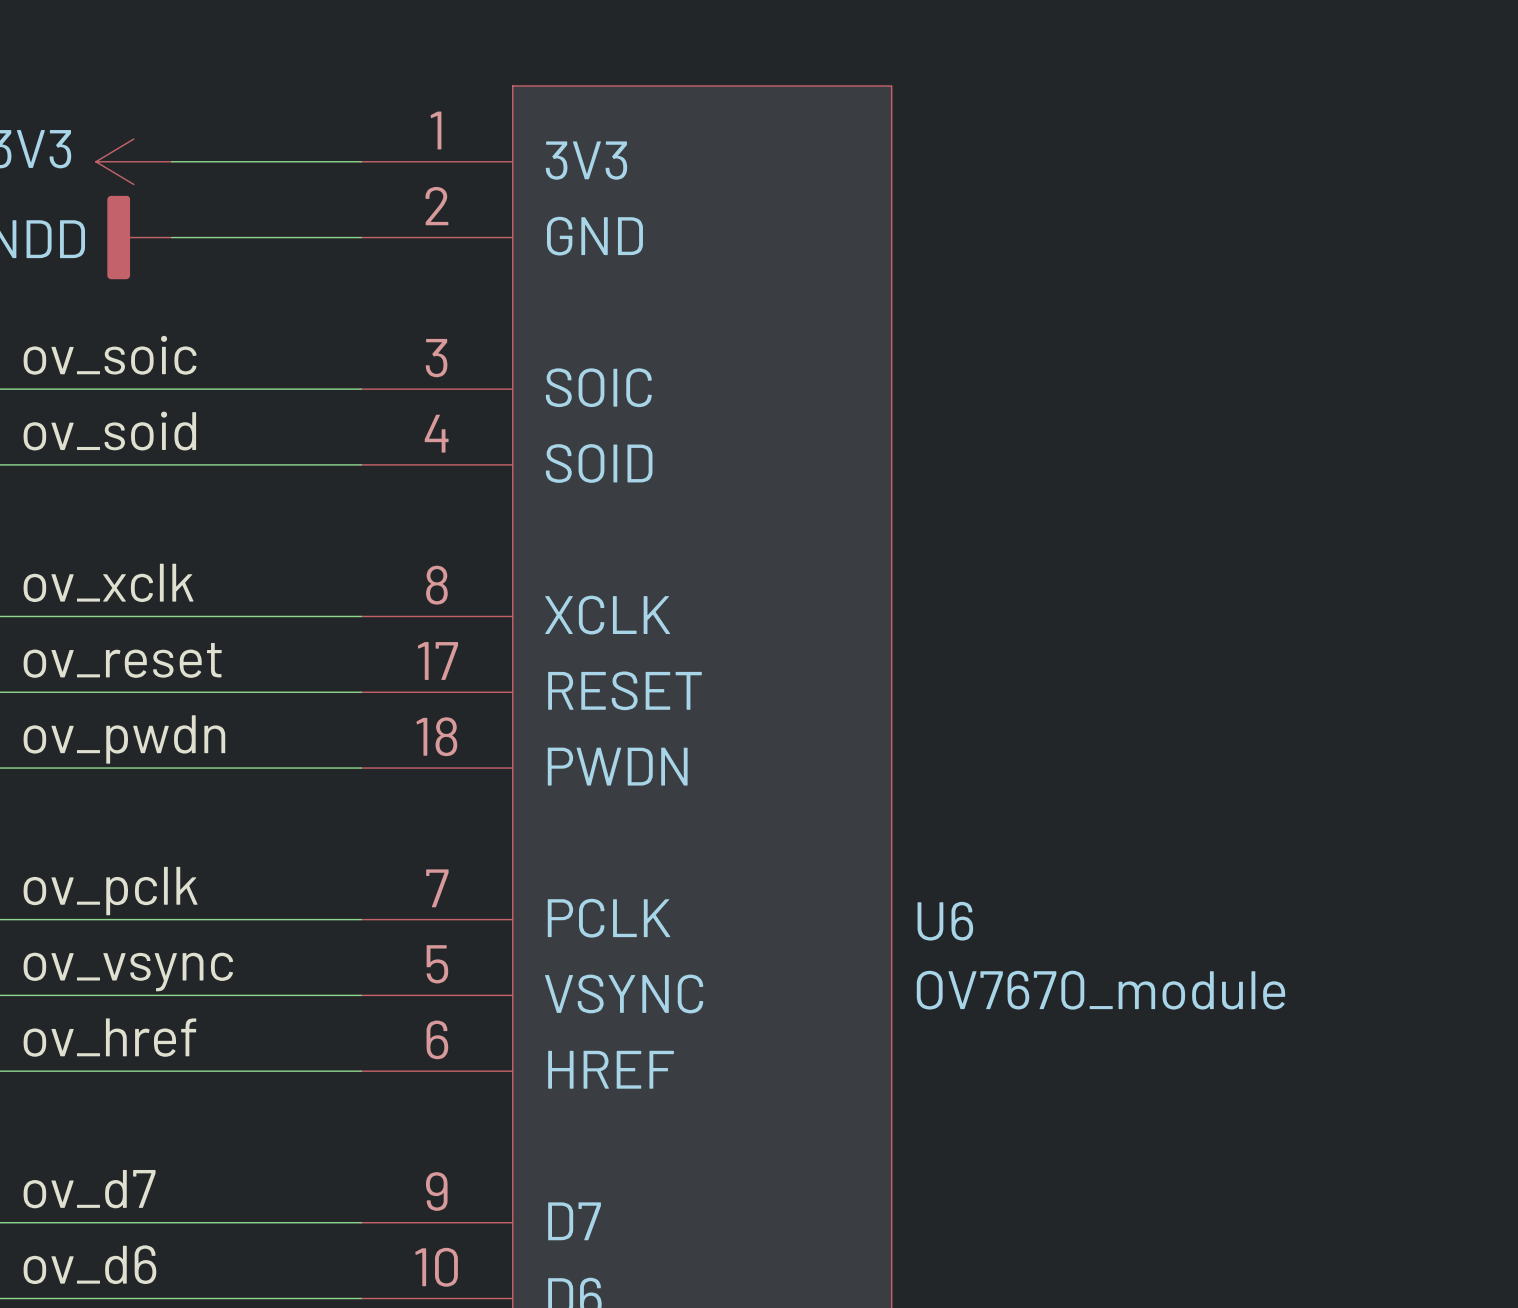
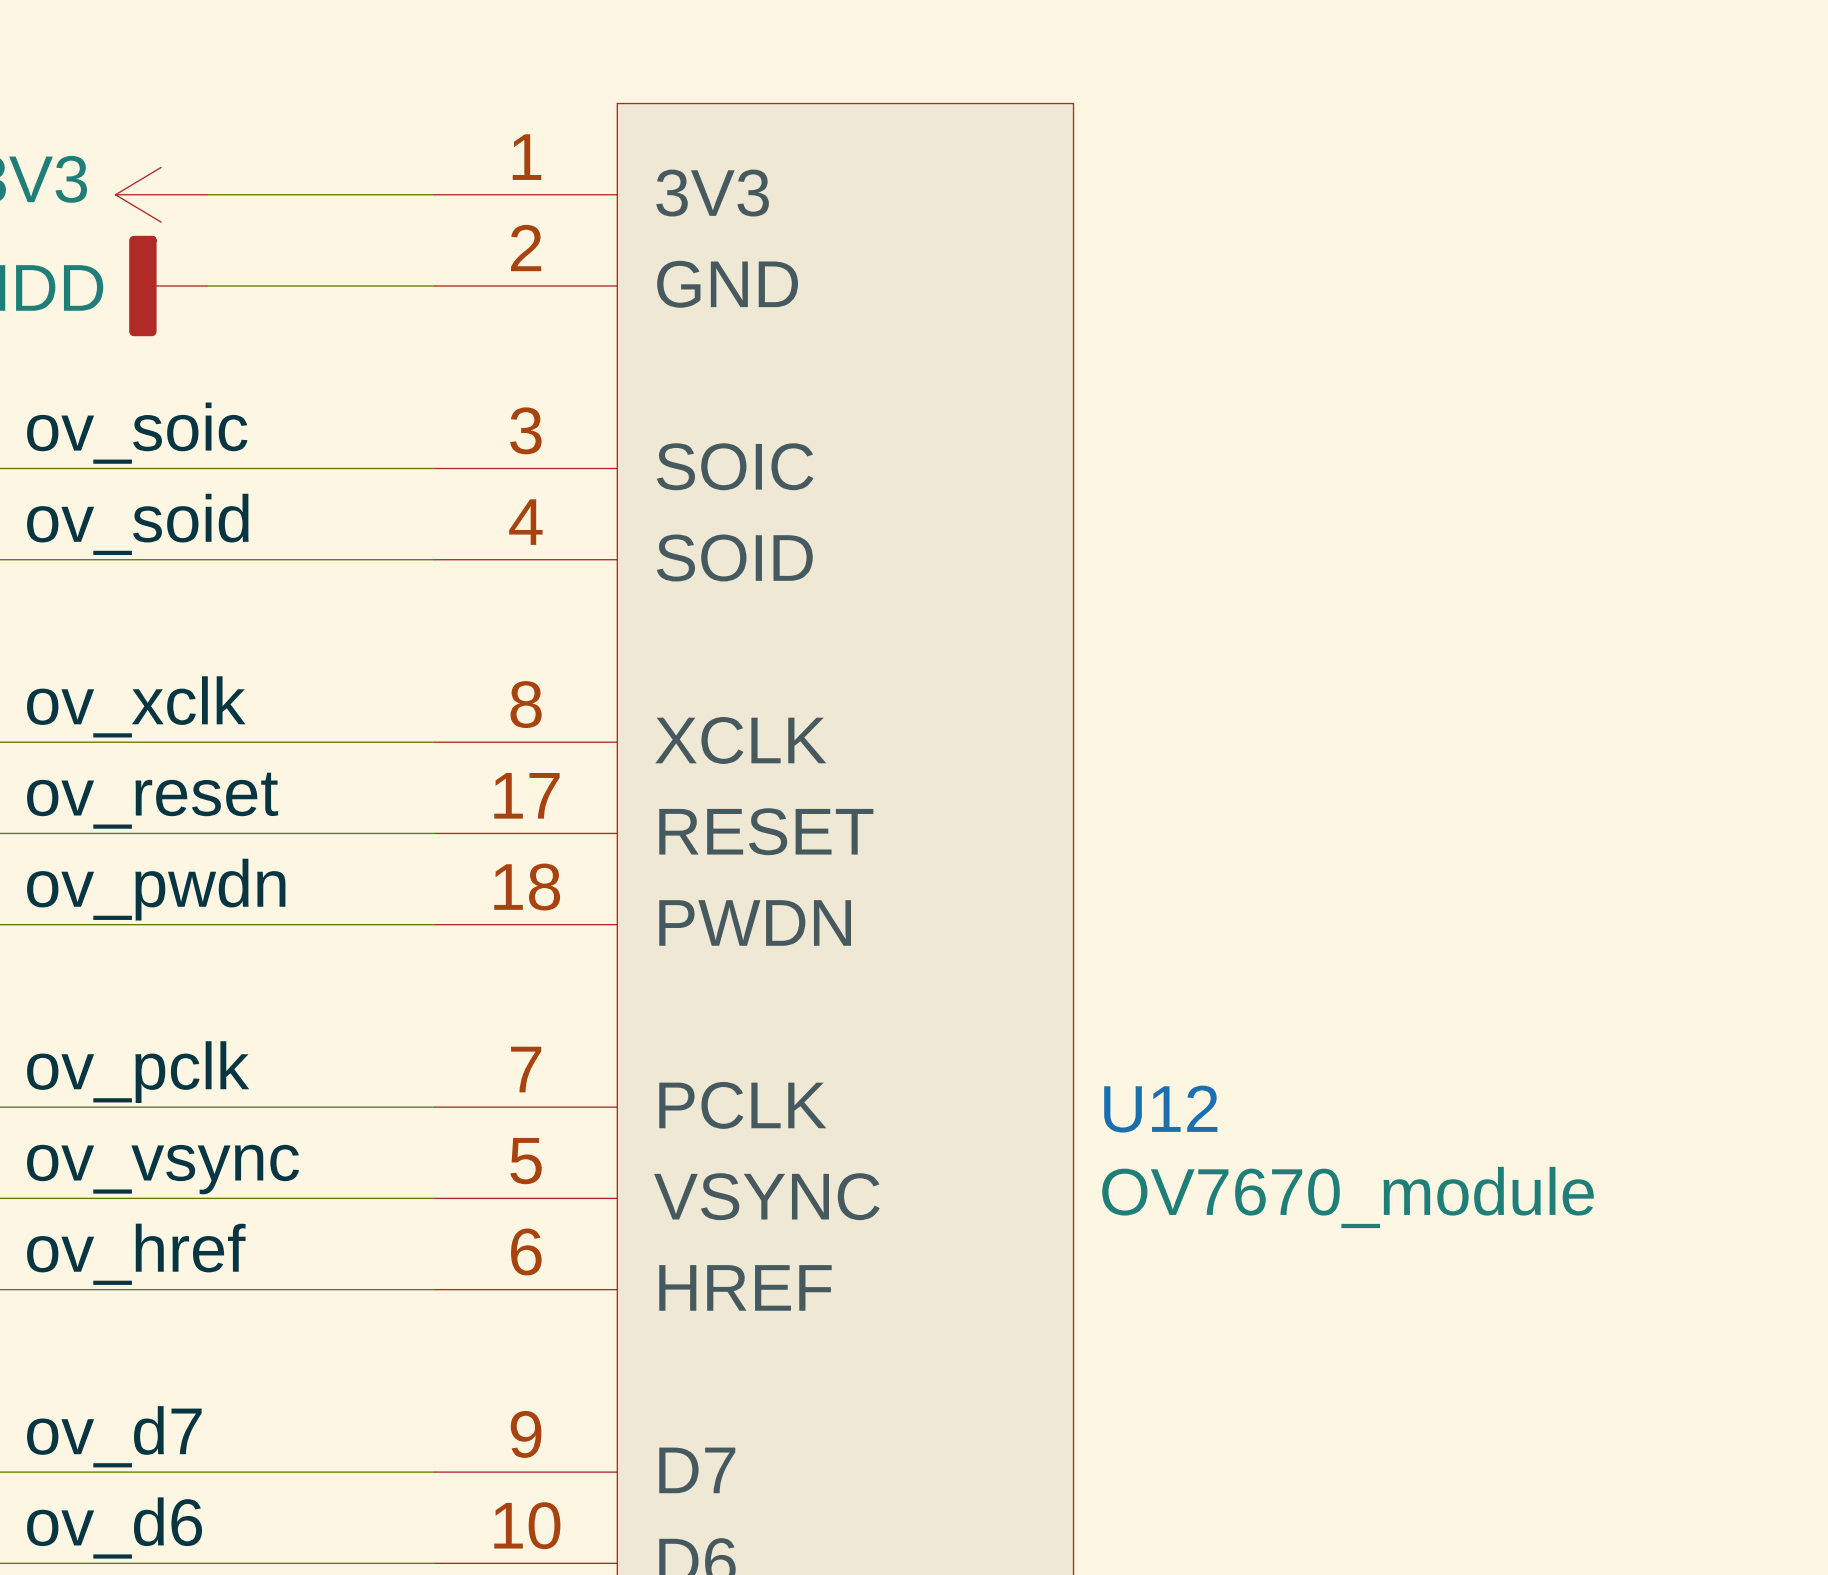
U6 name: U6 (945, 921) -> U12 (1160, 1109)

